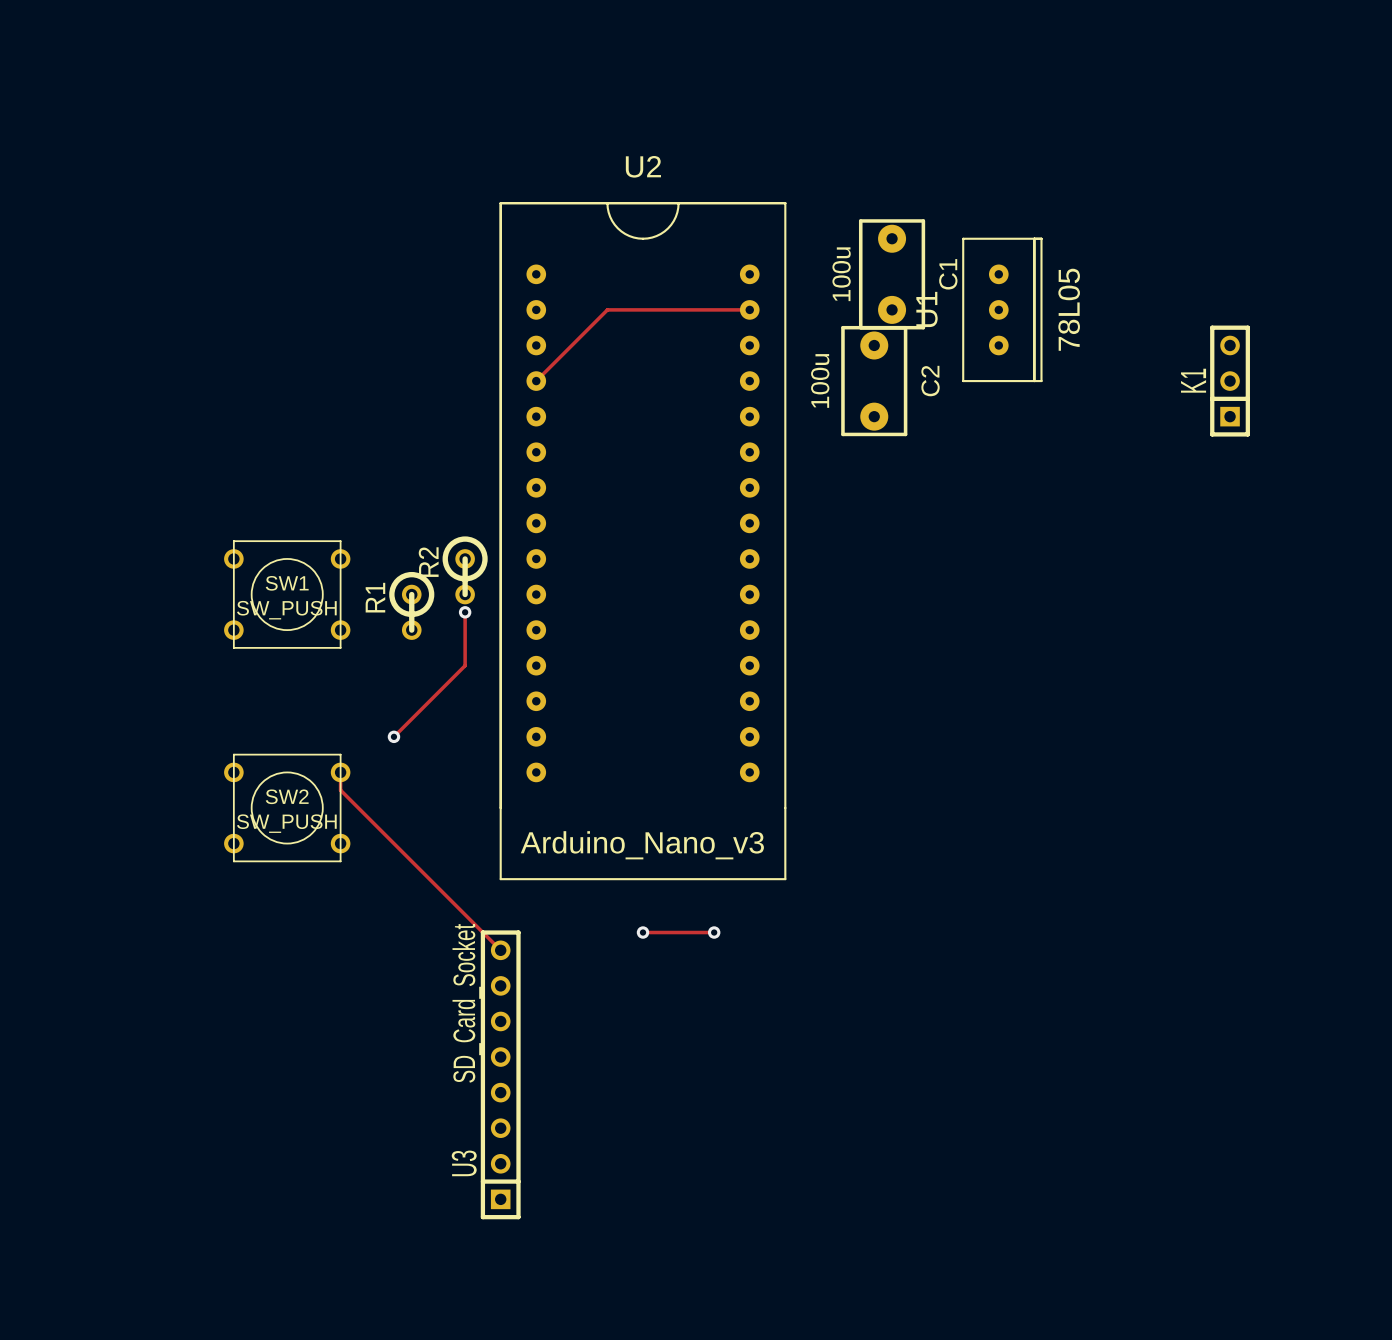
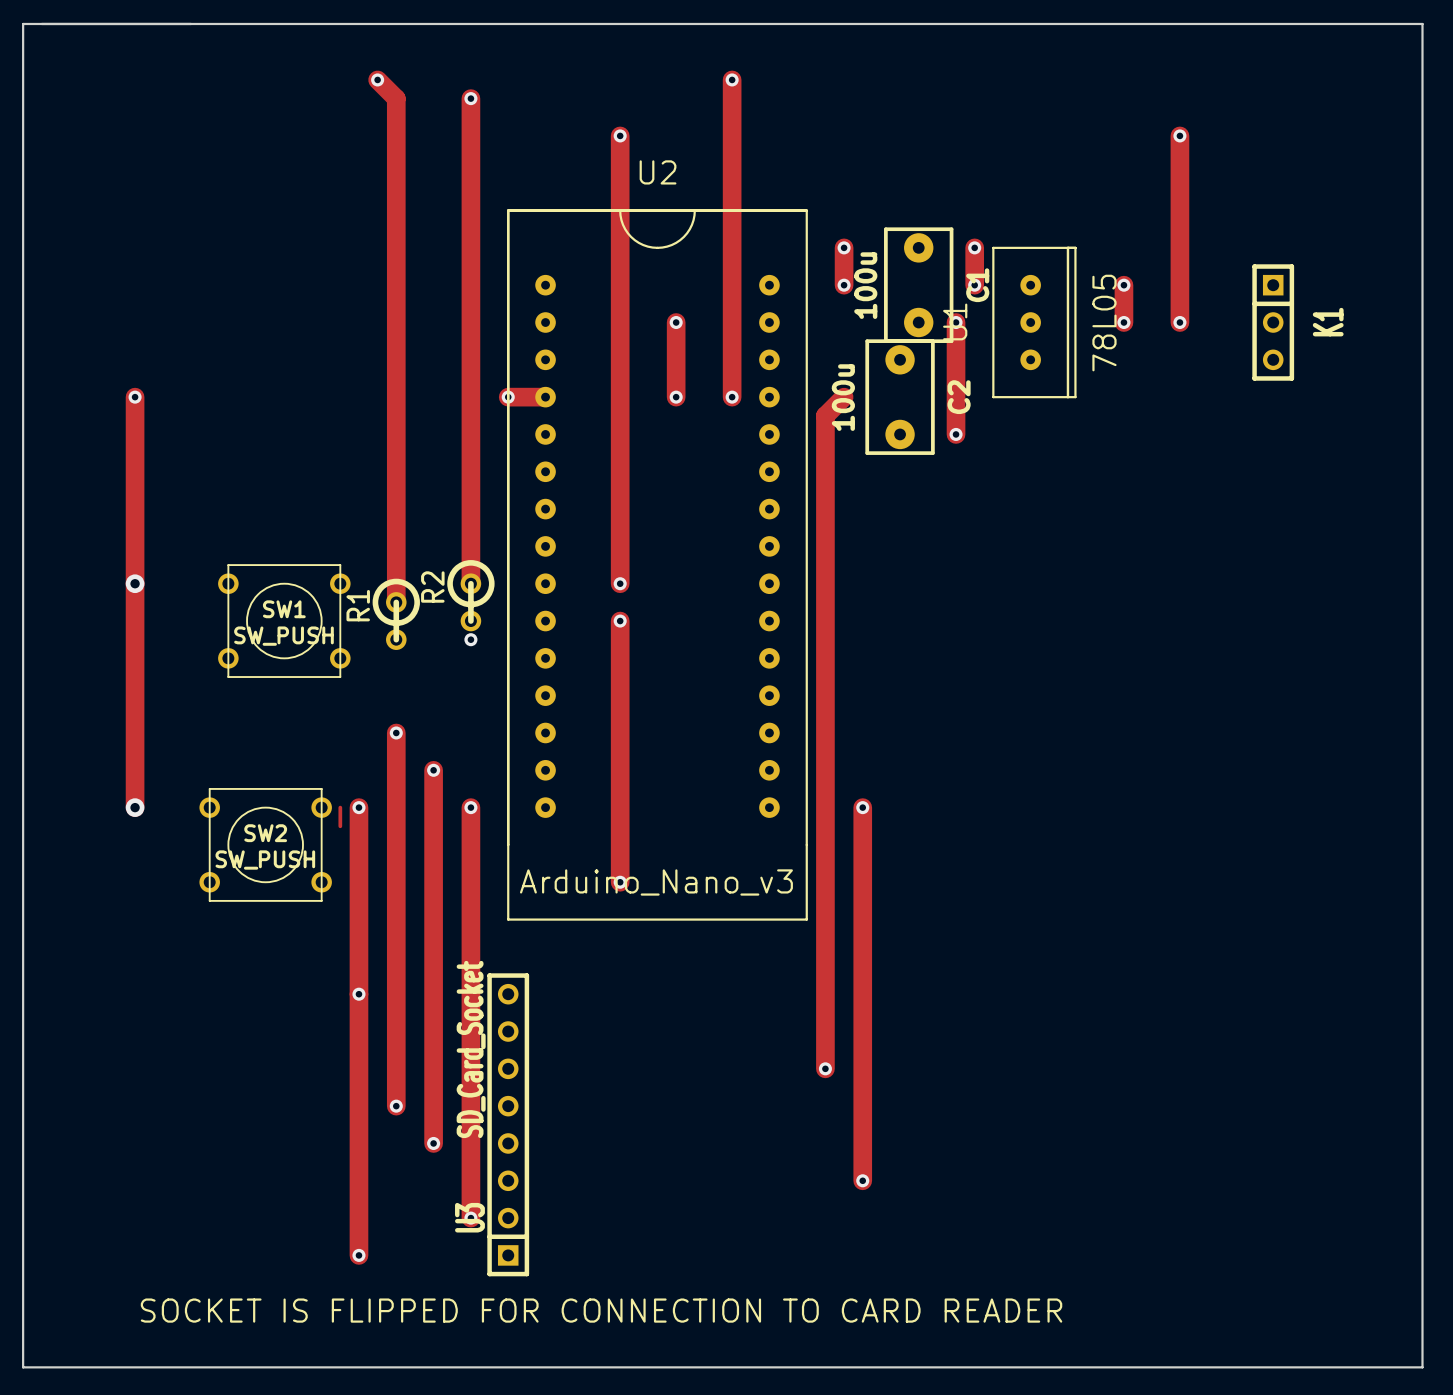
board edge: none -> (23, 23) (1422, 23) (1422, 1367) (23, 1367) (23, 23)
track: none -> (377, 79) (396, 98) (396, 602)
via: none -> (377, 79)
track: none -> (732, 79) (732, 397)
via: none -> (732, 79)
track: none -> (470, 98) (470, 583)
via: none -> (470, 98)
track: none -> (620, 135) (620, 583)
via: none -> (620, 135)
track: none -> (1179, 135) (1179, 322)
via: none -> (1179, 135)
track: none -> (844, 247) (844, 285)
via: none -> (844, 247)
track: none -> (974, 247) (974, 285)
via: none -> (974, 247)
via: none -> (844, 285)
via: none -> (974, 285)
track: none -> (1123, 285) (1123, 322)
via: none -> (1123, 285)
track: none -> (676, 322) (676, 397)
via: none -> (676, 322)
track: (749, 309) (607, 309) (536, 381) -> (508, 397) (545, 397)
track: none -> (956, 322) (956, 434)
via: none -> (956, 322)
via: none -> (1123, 322)
via: none -> (1179, 322)
track: none -> (135, 397) (135, 807)
via: none -> (135, 397)
via: none -> (508, 397)
via: none -> (676, 397)
via: none -> (732, 397)
track: none -> (844, 397) (825, 415) (825, 1068)
K1 rotation: 0° (1230, 381) -> 180° (1273, 322)
K1 position: (1230, 381) -> (1273, 322)
via: none -> (956, 434)
via: none -> (135, 583)
via: none -> (620, 583)
track: none -> (620, 621) (620, 882)
via: none -> (620, 621)
R1 position: (411, 605) -> (396, 614)
track: (465, 612) (465, 665) (393, 736) -> none
track: none -> (396, 732) (396, 1106)
via: none -> (396, 732)
via: (393, 736) -> none
track: none -> (433, 770) (433, 1143)
via: none -> (433, 770)
via: none -> (135, 807)
track: none -> (358, 807) (358, 1255)
via: none -> (358, 807)
track: none -> (470, 807) (470, 1218)
via: none -> (470, 807)
track: none -> (862, 807) (862, 1180)
via: none -> (862, 807)
track: (340, 790) (500, 950) -> none
SW2 position: (287, 808) -> (265, 844)
via: none -> (620, 882)
track: (643, 932) (714, 932) -> none
via: (643, 932) -> none
via: (714, 932) -> none
via: none -> (358, 994)
via: none -> (825, 1068)
via: none -> (396, 1106)
via: none -> (433, 1143)
via: none -> (862, 1180)
via: none -> (470, 1218)
via: none -> (358, 1255)
U3 text: none -> SOCKET IS FLIPPED FOR CONNECTION TO CARD READER (601, 1310)

